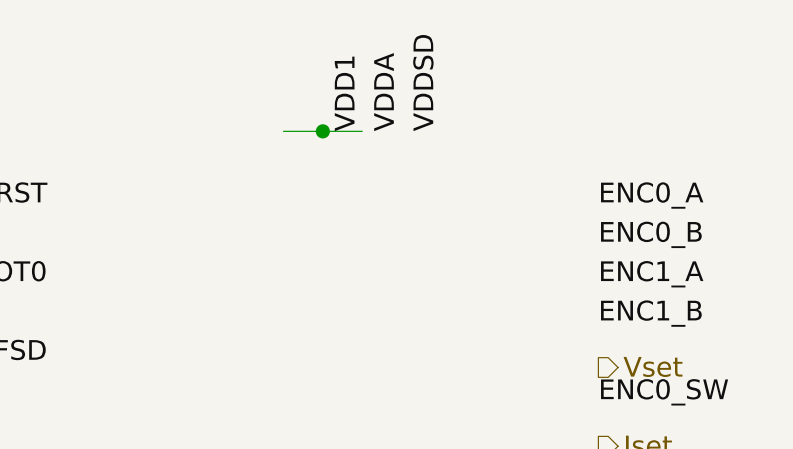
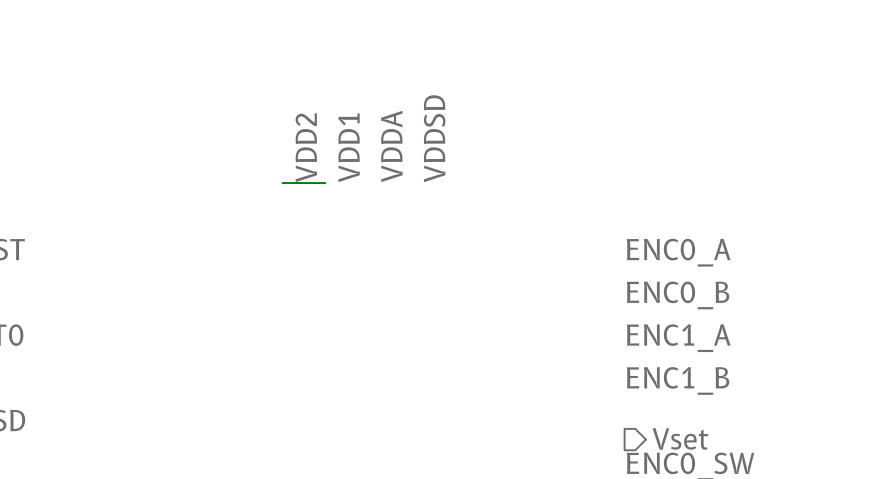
label: none -> VDD2 (306, 147)
wire: (322, 131) (362, 131) -> none
junction: (322, 131) -> none

